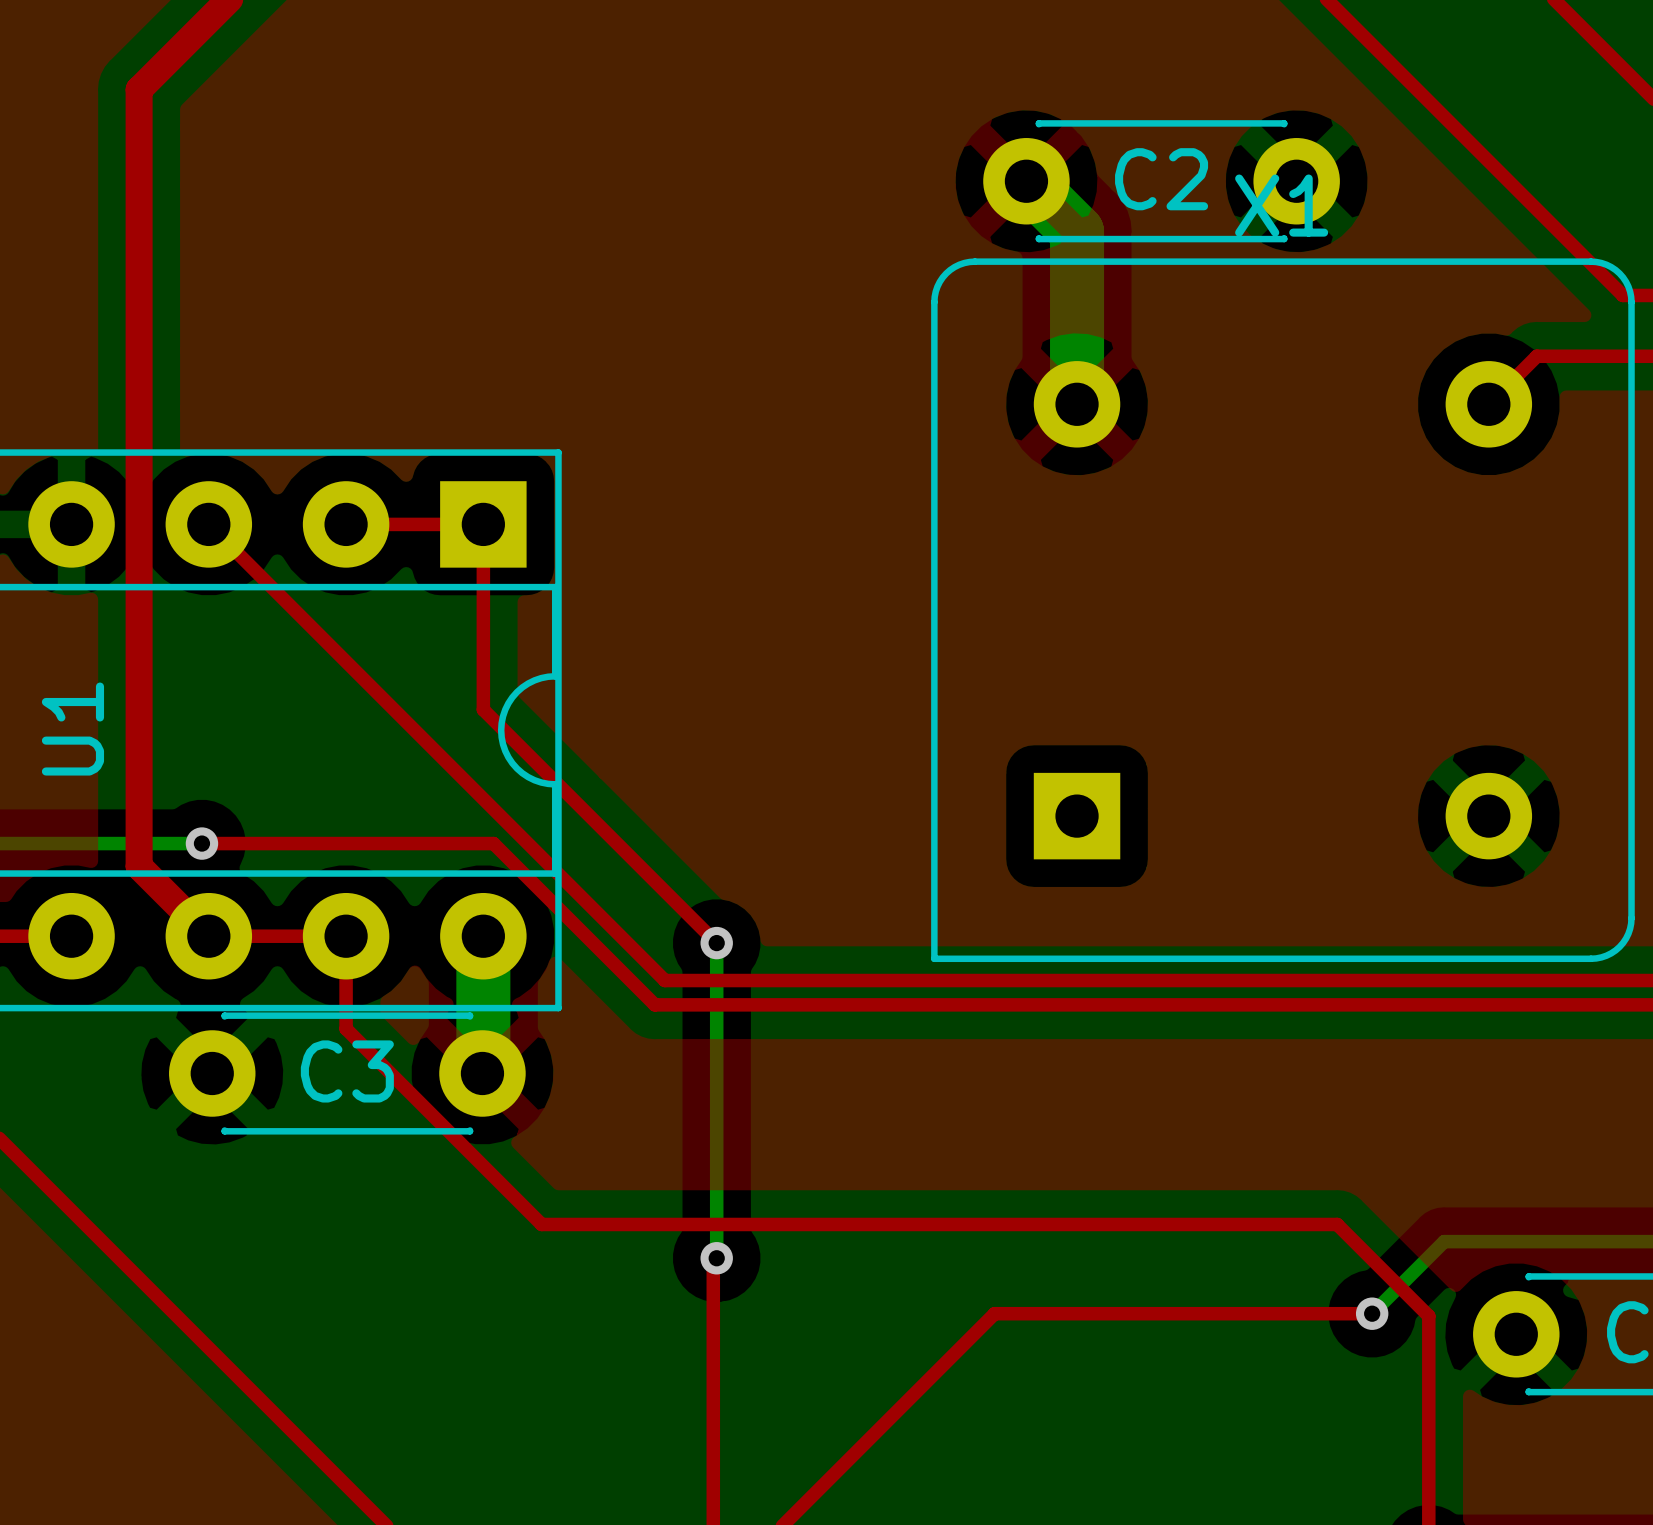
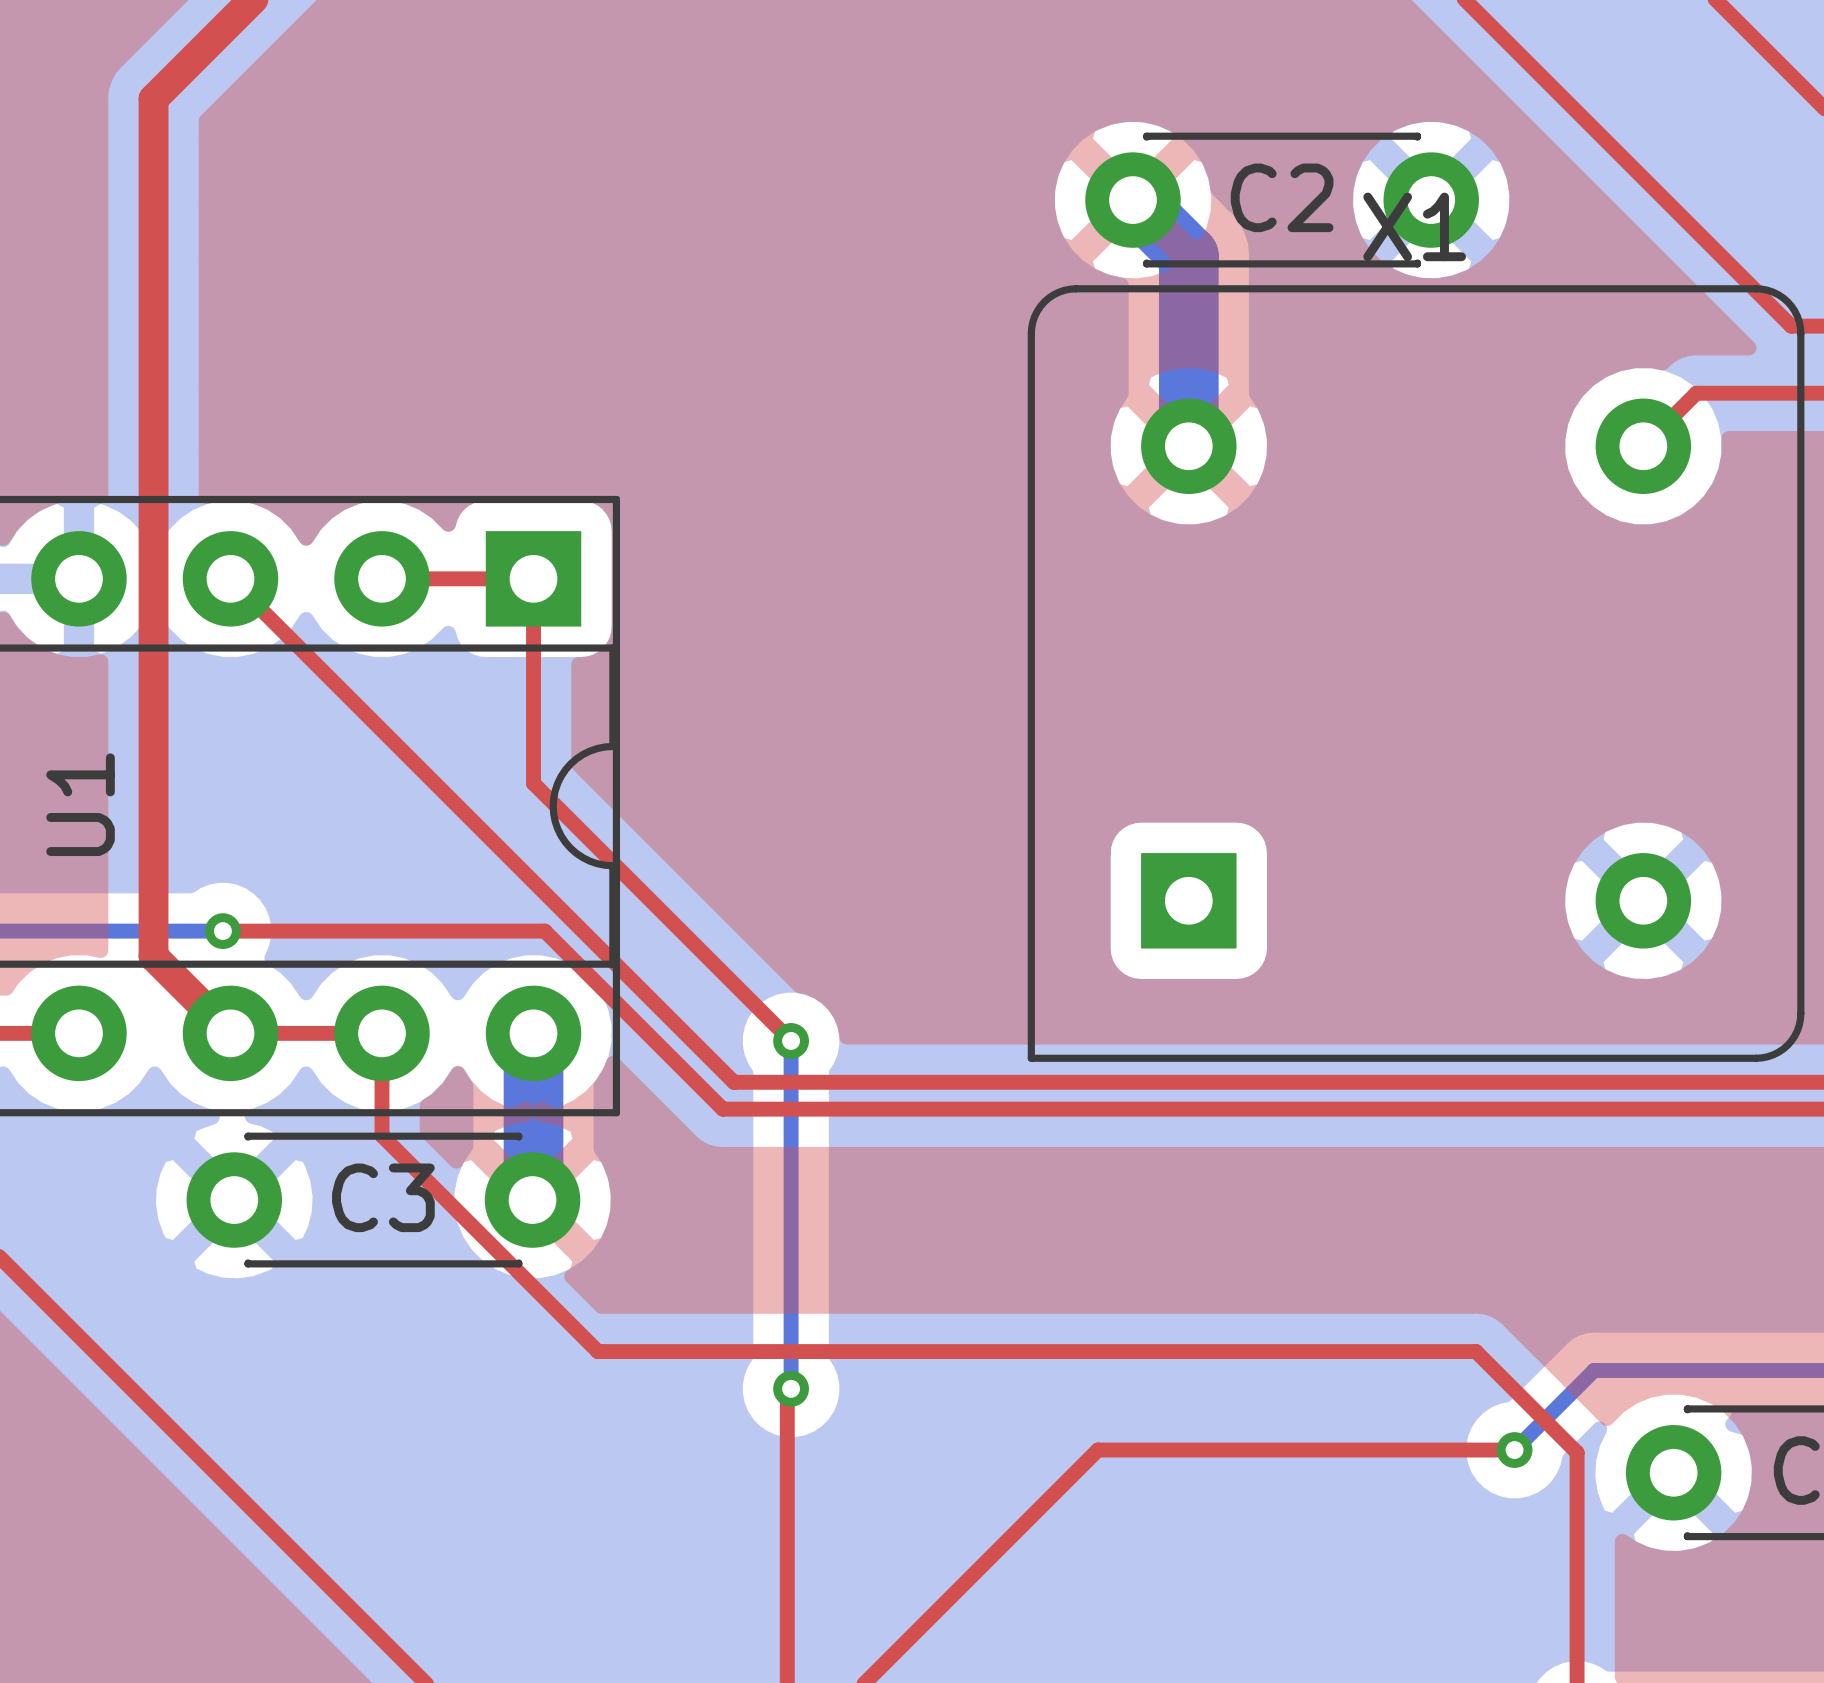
C3 position: (347, 1073) -> (383, 1200)

